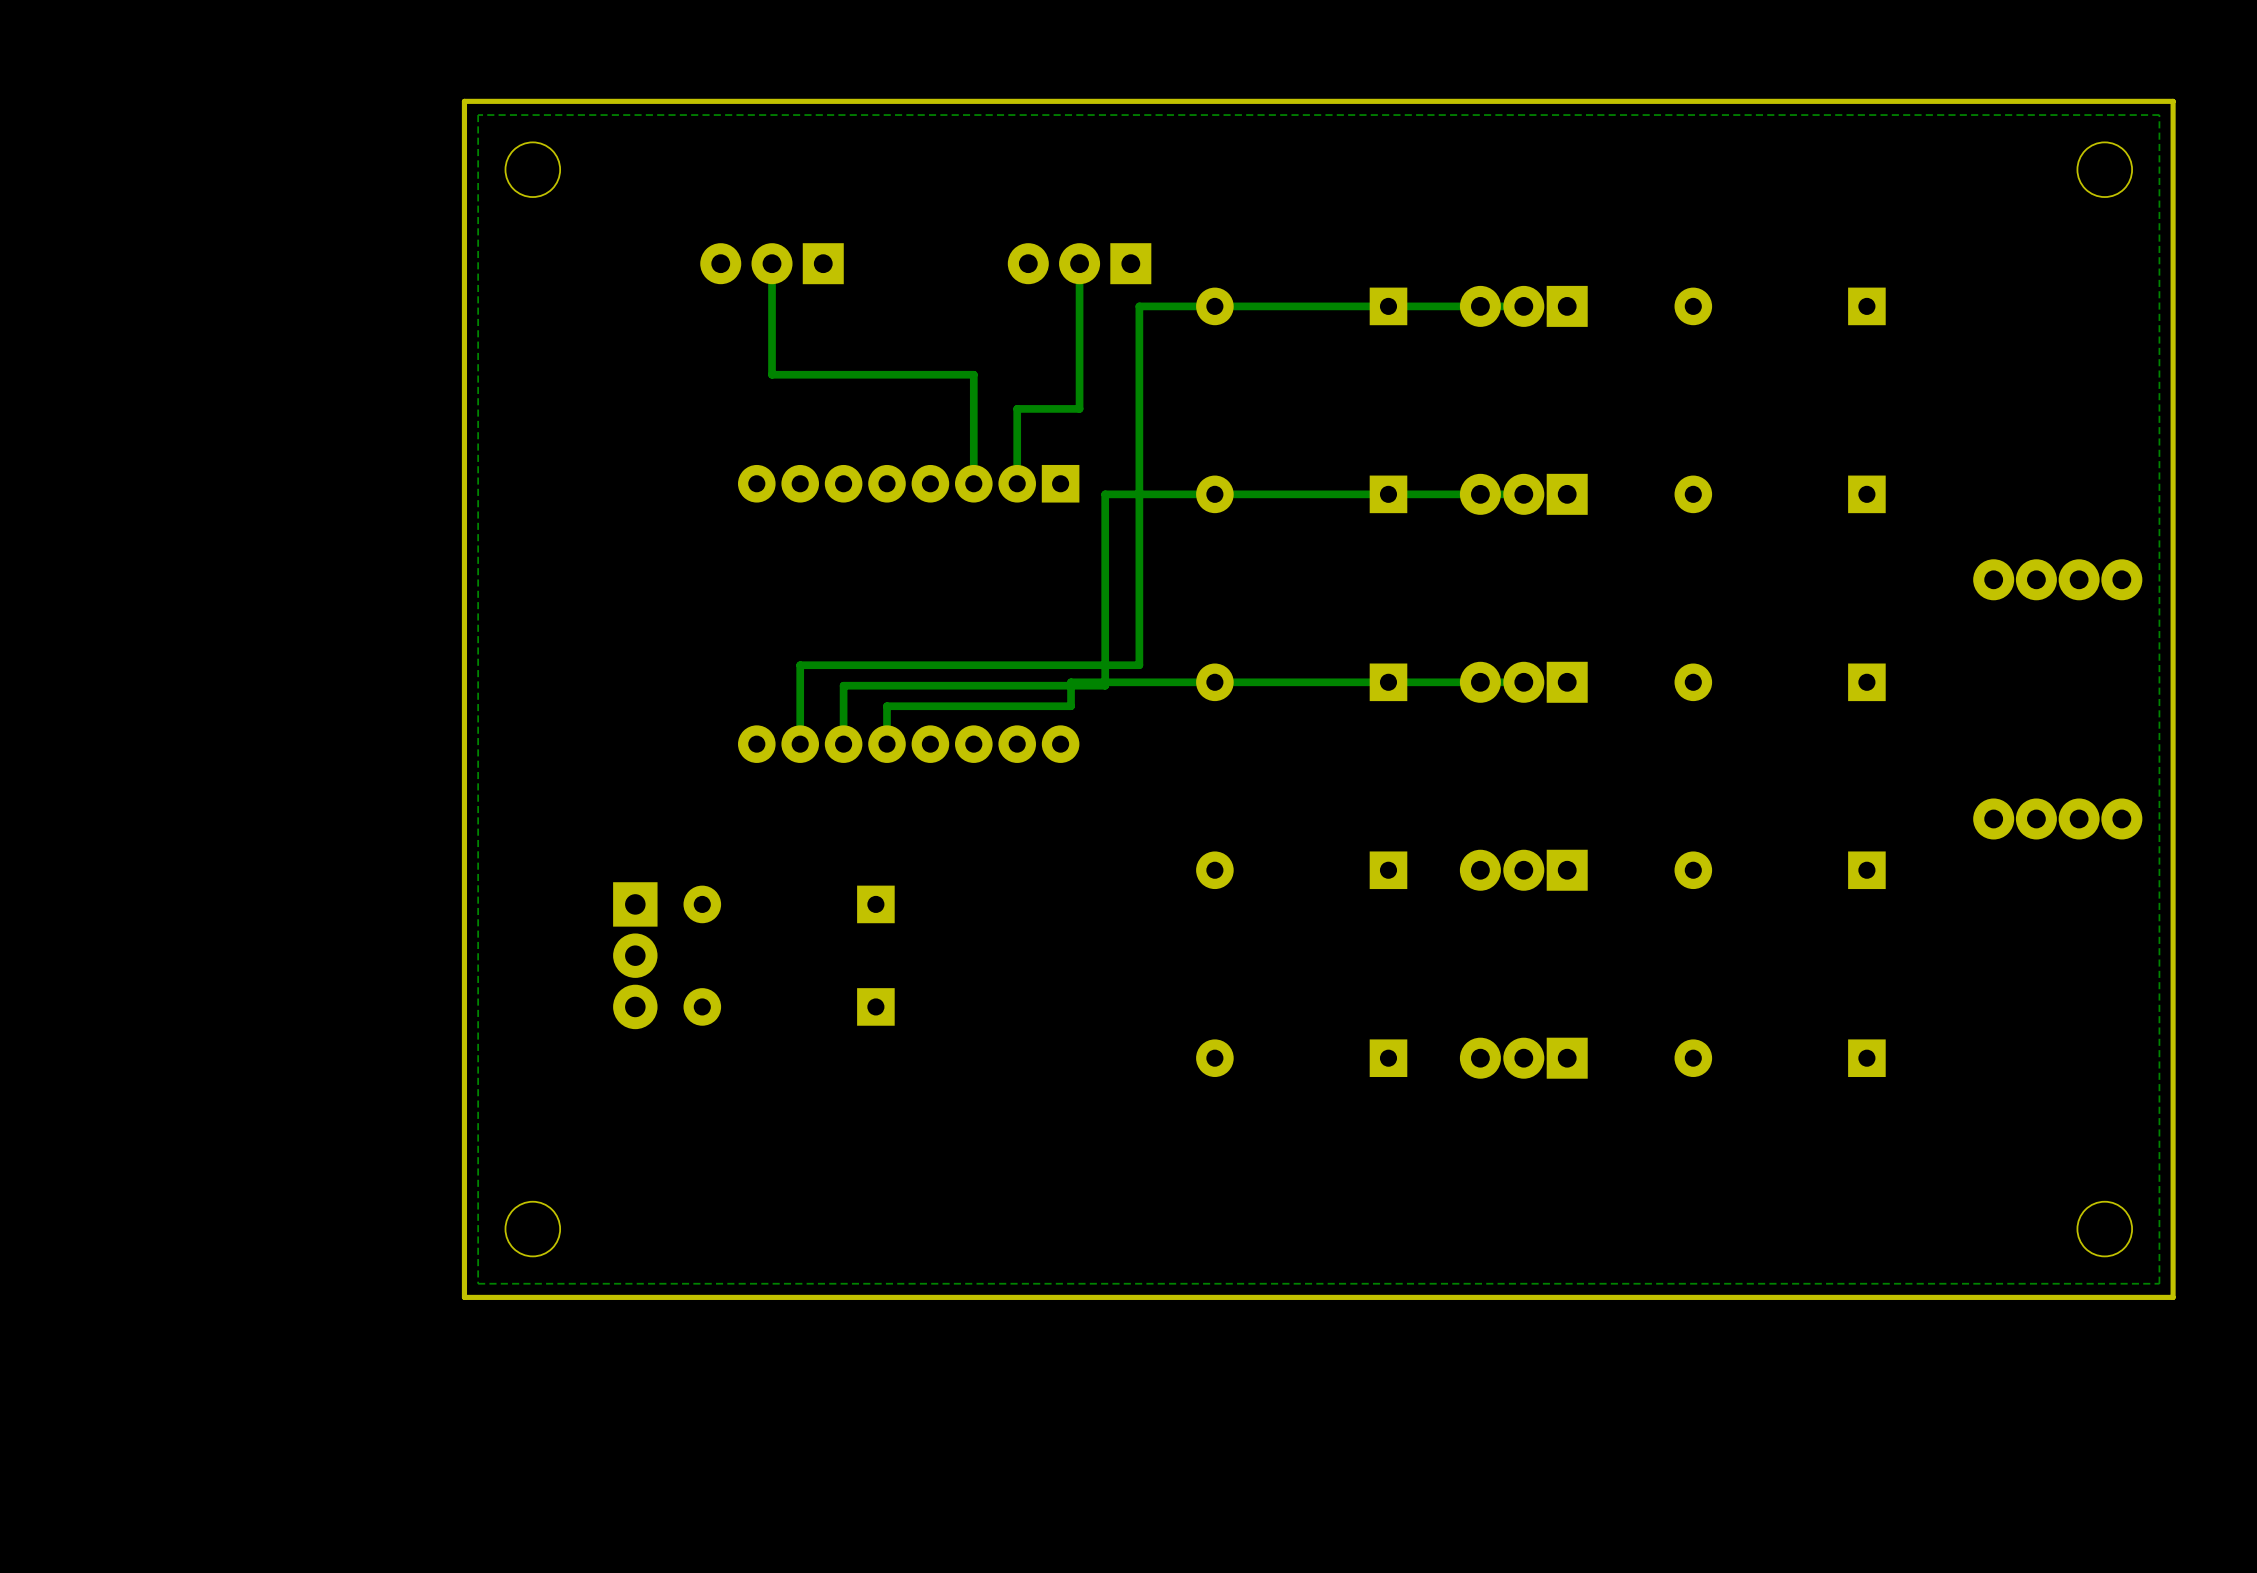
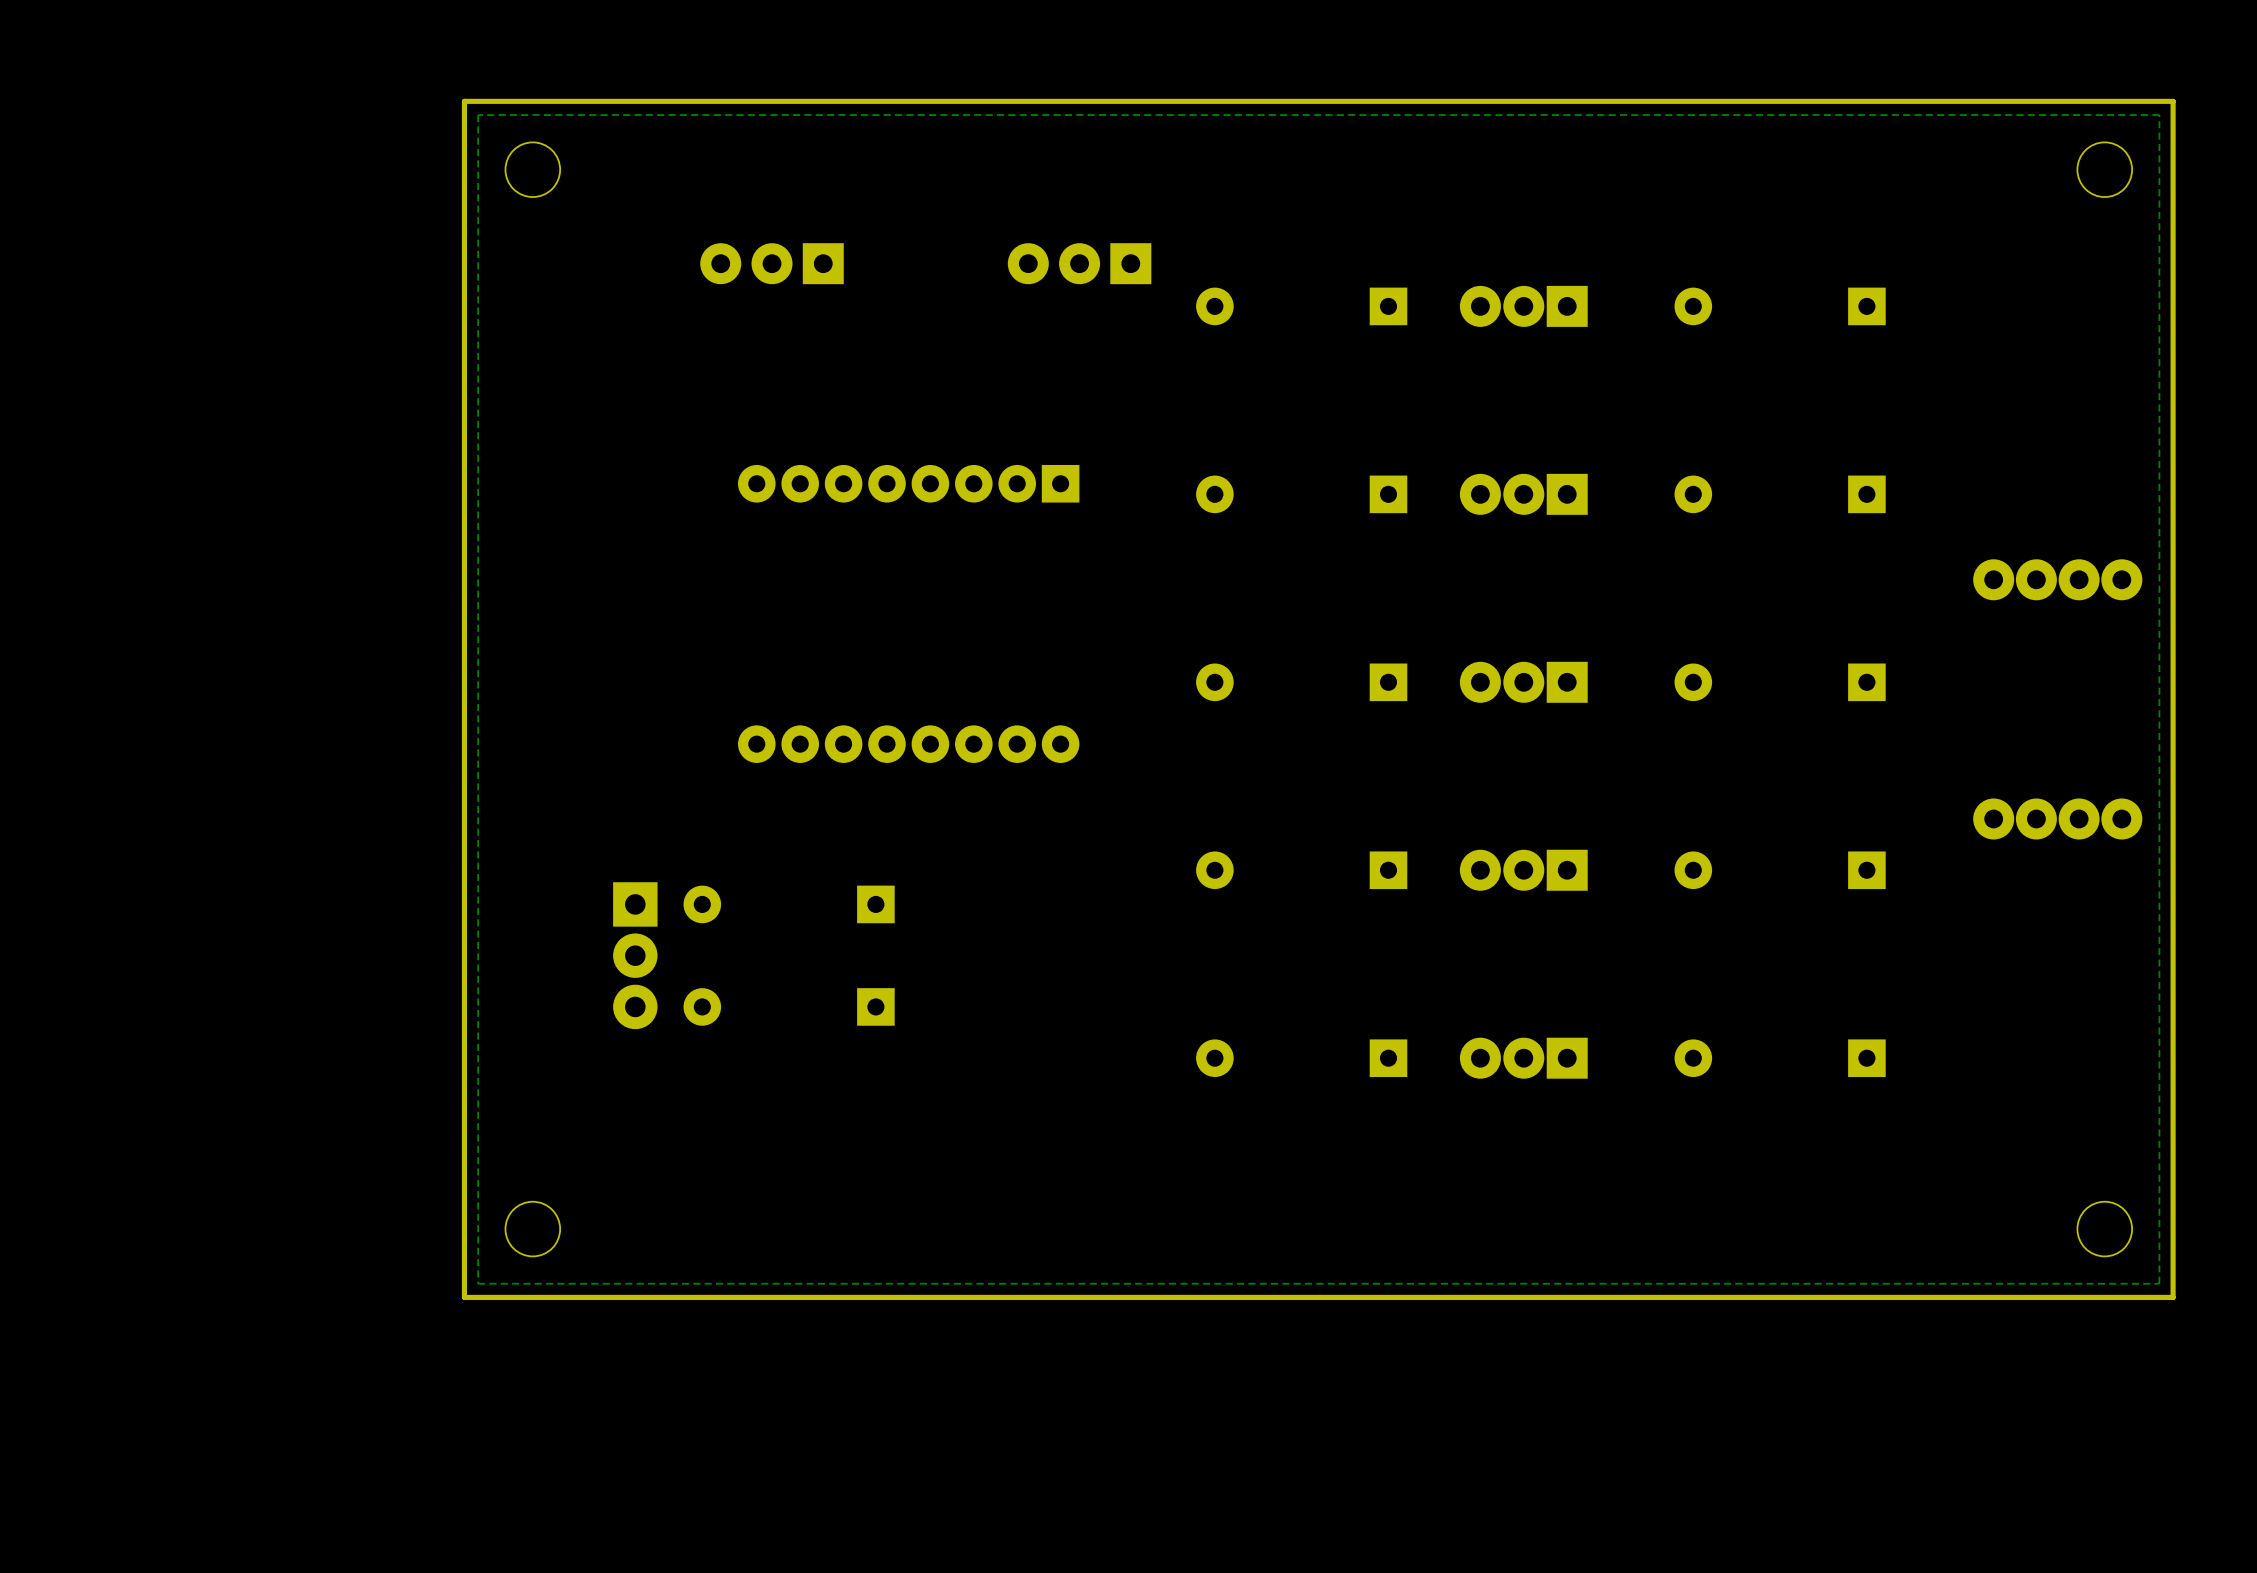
track: (772, 263) (772, 374) (973, 374) (973, 483) -> none
track: (1079, 263) (1079, 408) (1017, 408) (1017, 483) -> none
track: (1523, 306) (1139, 306) (1139, 665) (800, 665) (800, 744) -> none
track: (1523, 494) (1105, 494) (1105, 685) (843, 685) (843, 744) -> none
track: (1523, 682) (1071, 682) (1071, 706) (887, 706) (887, 744) -> none

